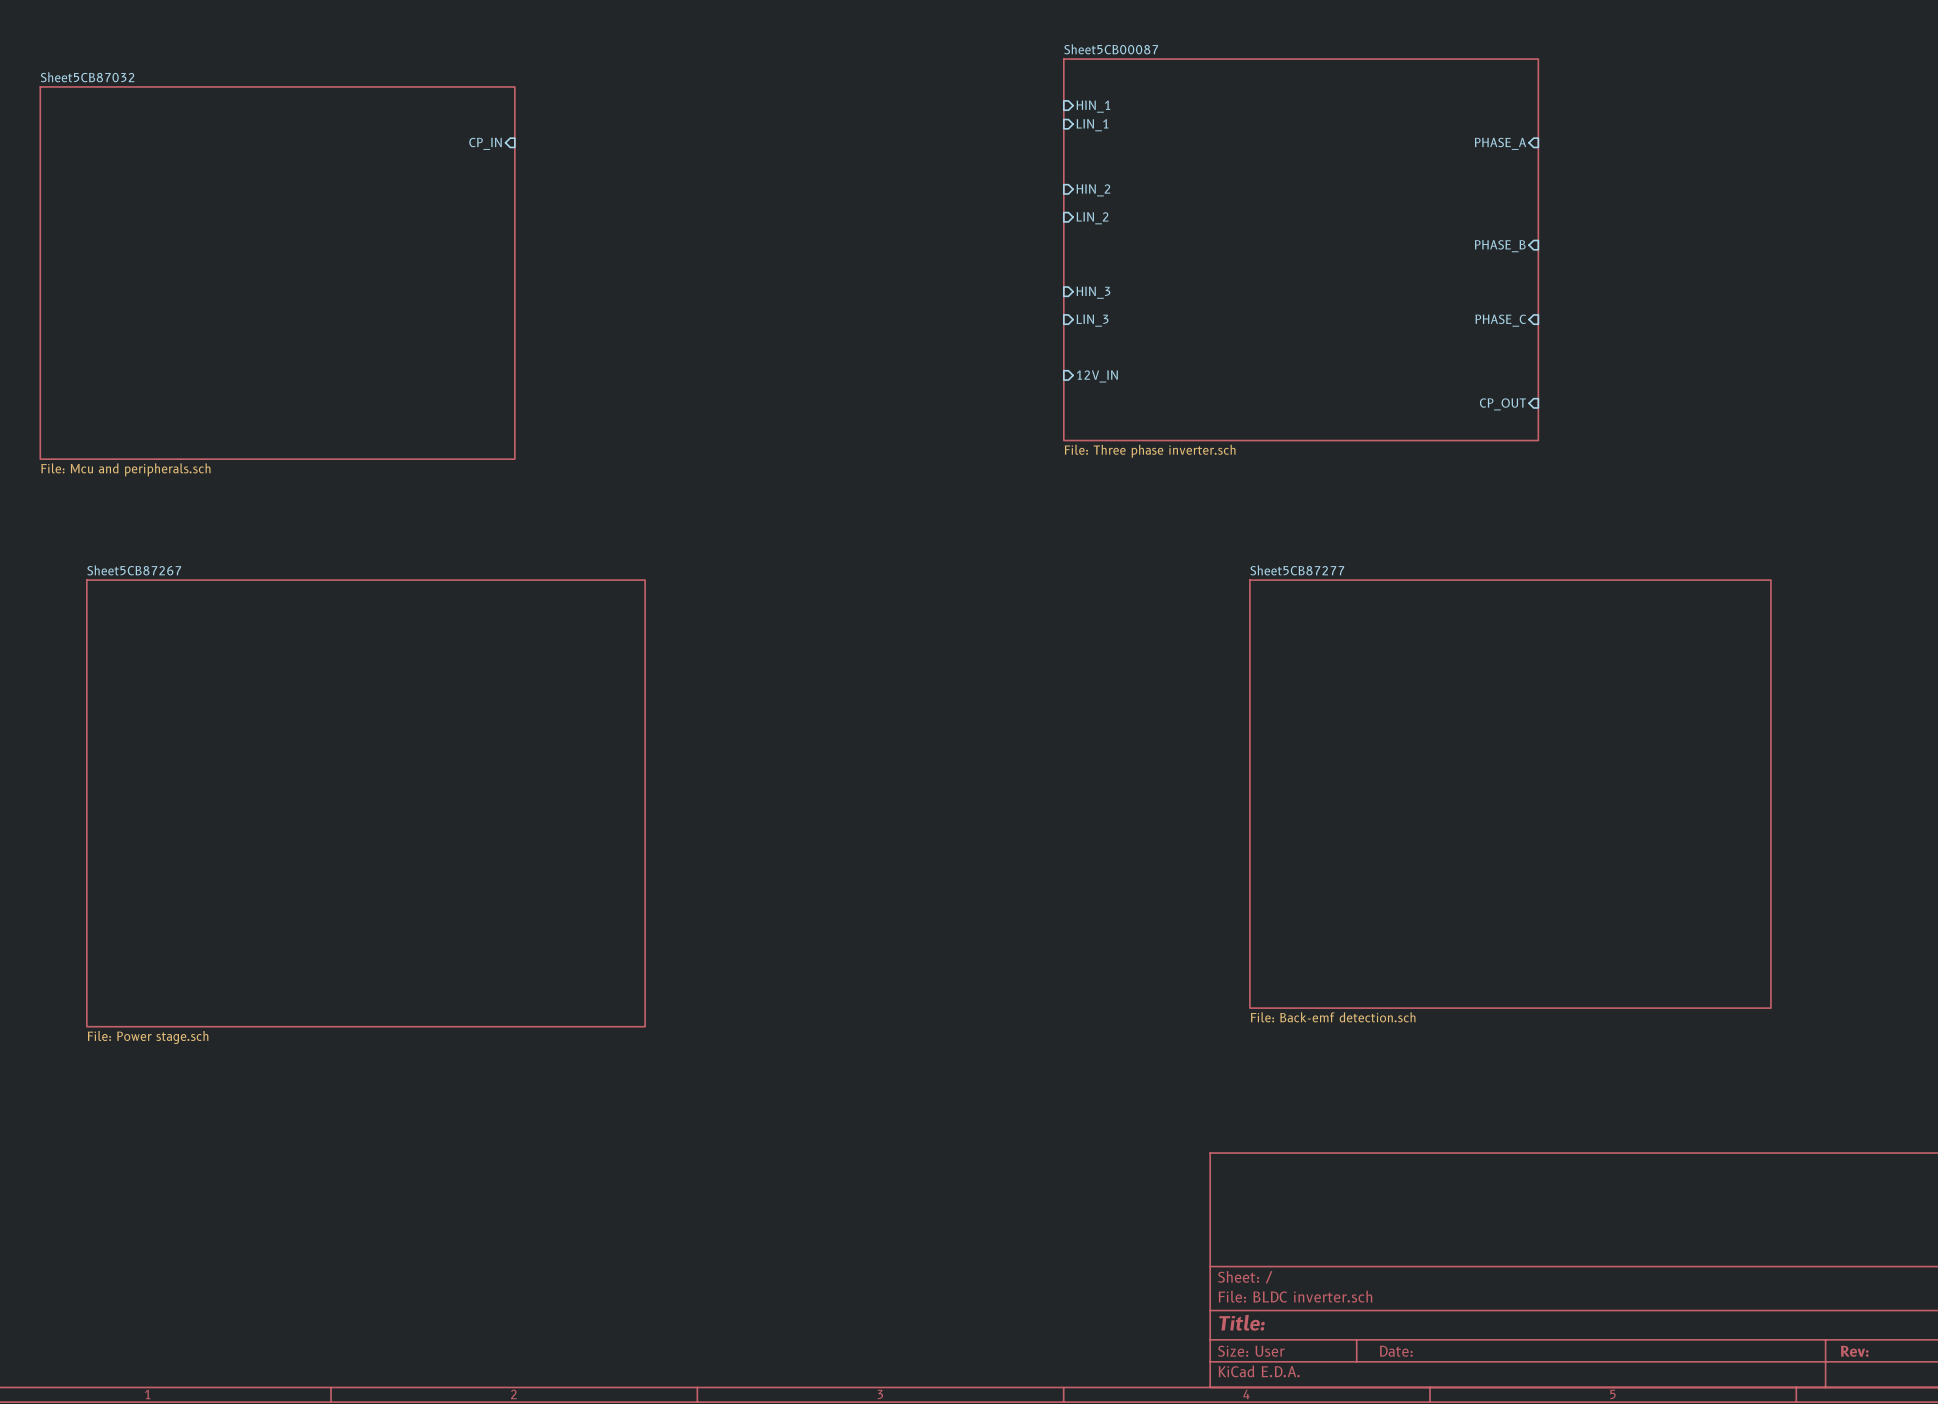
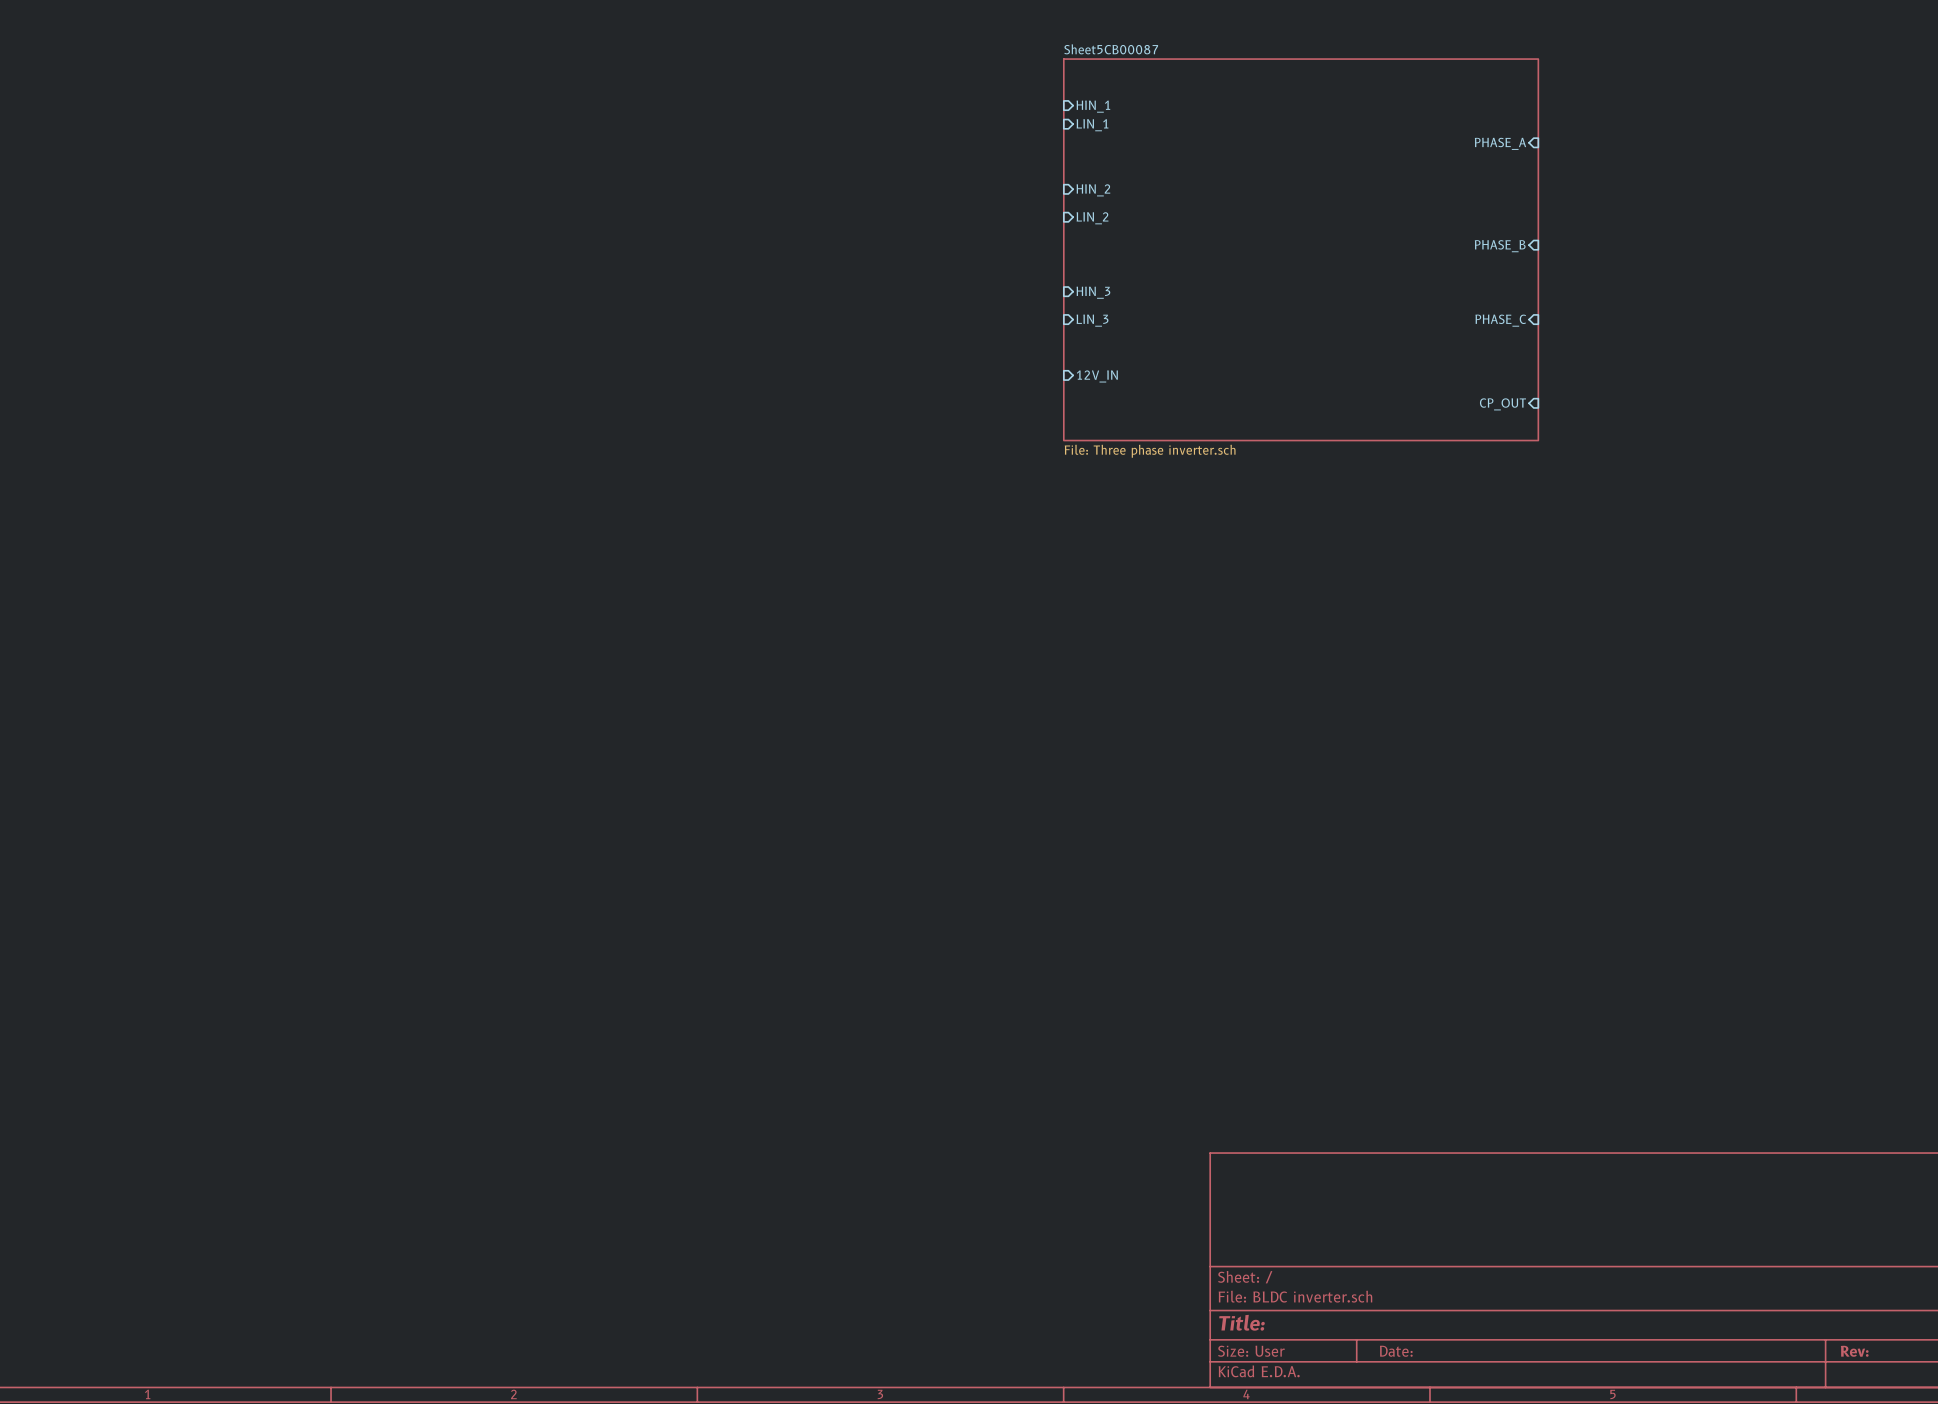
sheet pin: CP_IN (485, 143) -> none
sheet Sheet5CB87032: File: Mcu and peripherals.sch (277, 273) -> none
sheet Sheet5CB87277: File: Back-emf detection.sch (1510, 794) -> none
sheet Sheet5CB87267: File: Power stage.sch (365, 803) -> none

